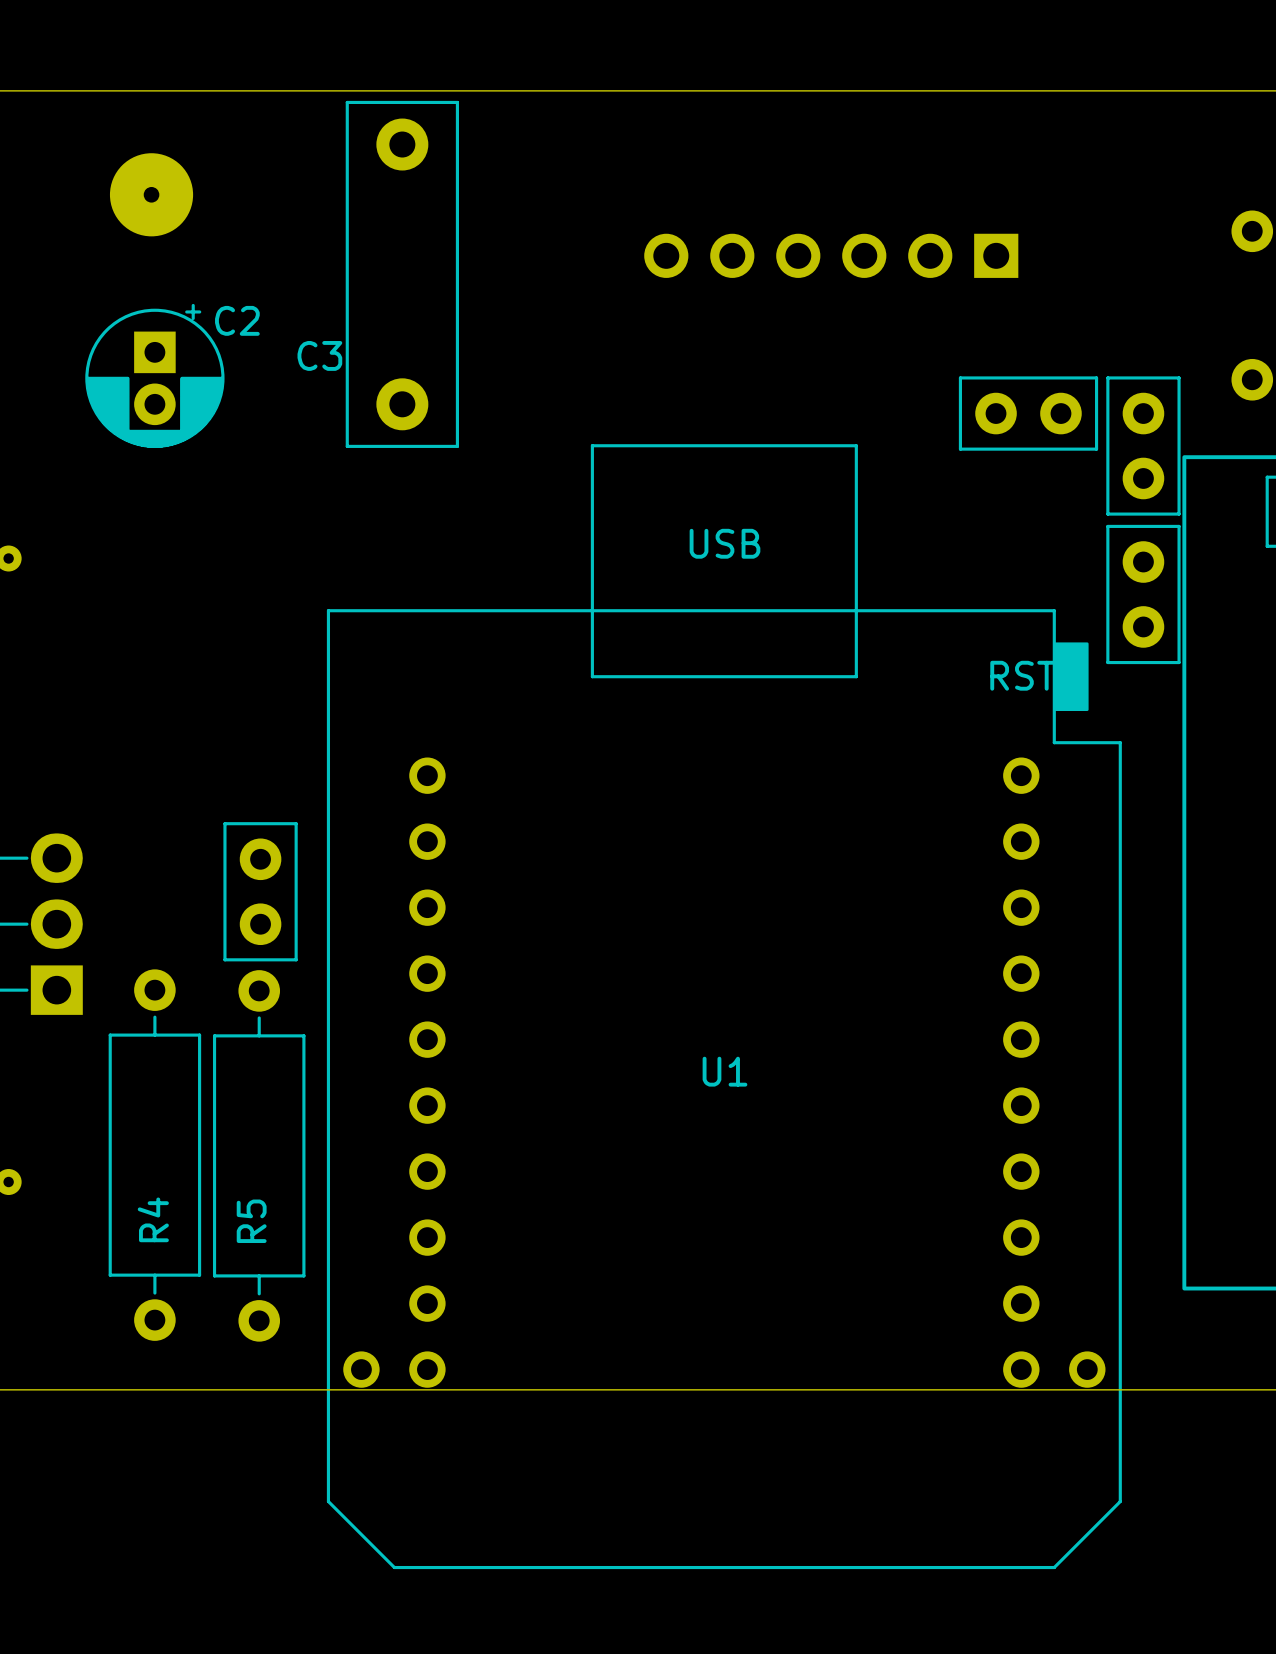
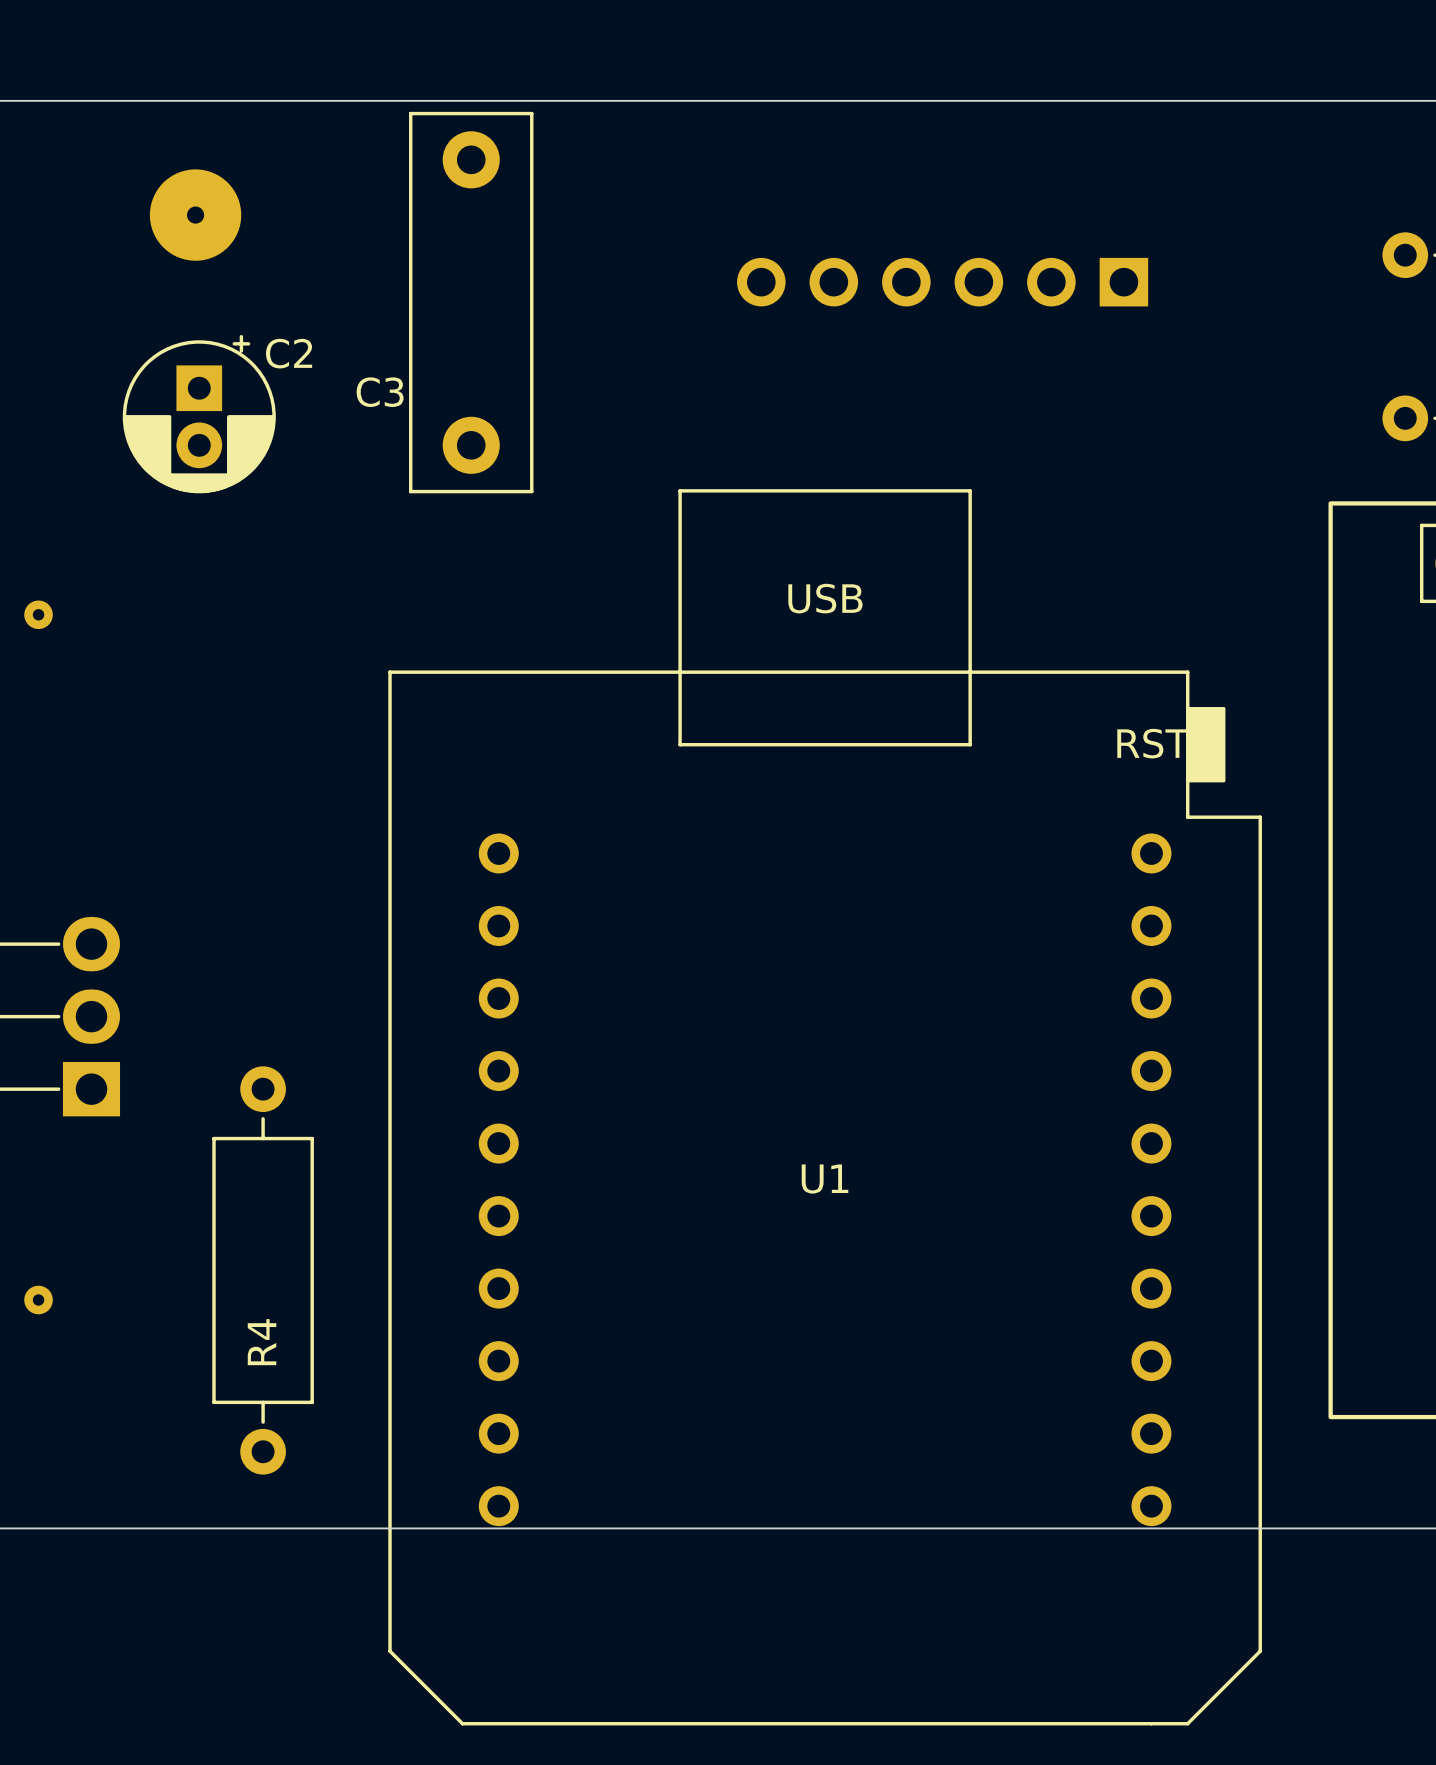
part: (1028, 413) -> none
U1 footprint: [326, 444, 1122, 1570] -> [388, 489, 1262, 1726]
part: (1143, 446) -> none
part: (1143, 594) -> none
part: (260, 891) -> none
R4 position: (154, 1155) -> (263, 1270)
R5: (259, 1155) -> none

